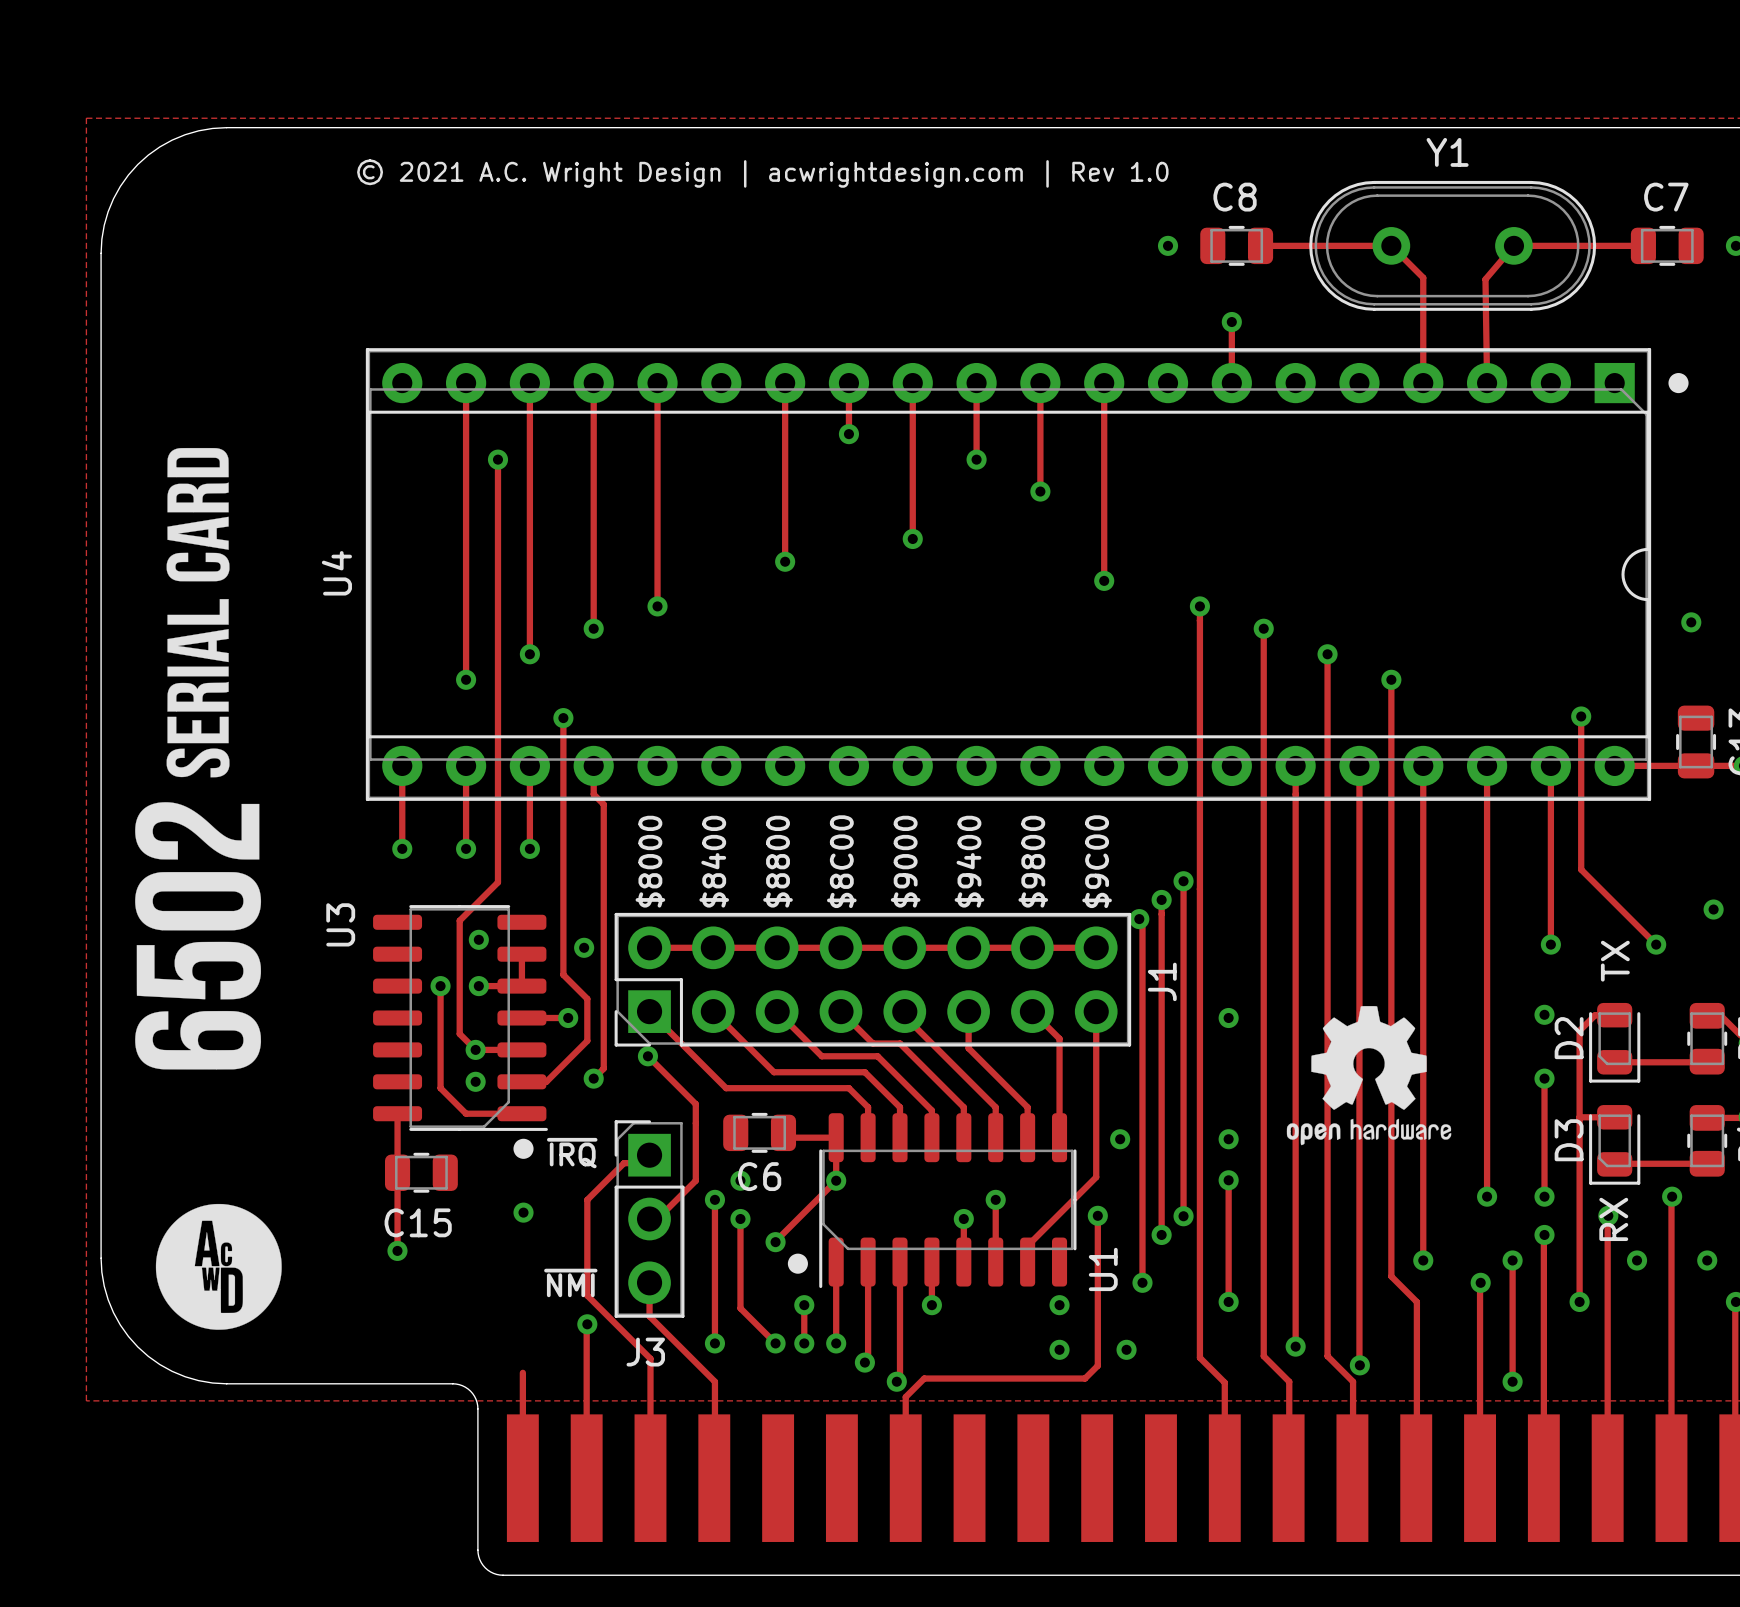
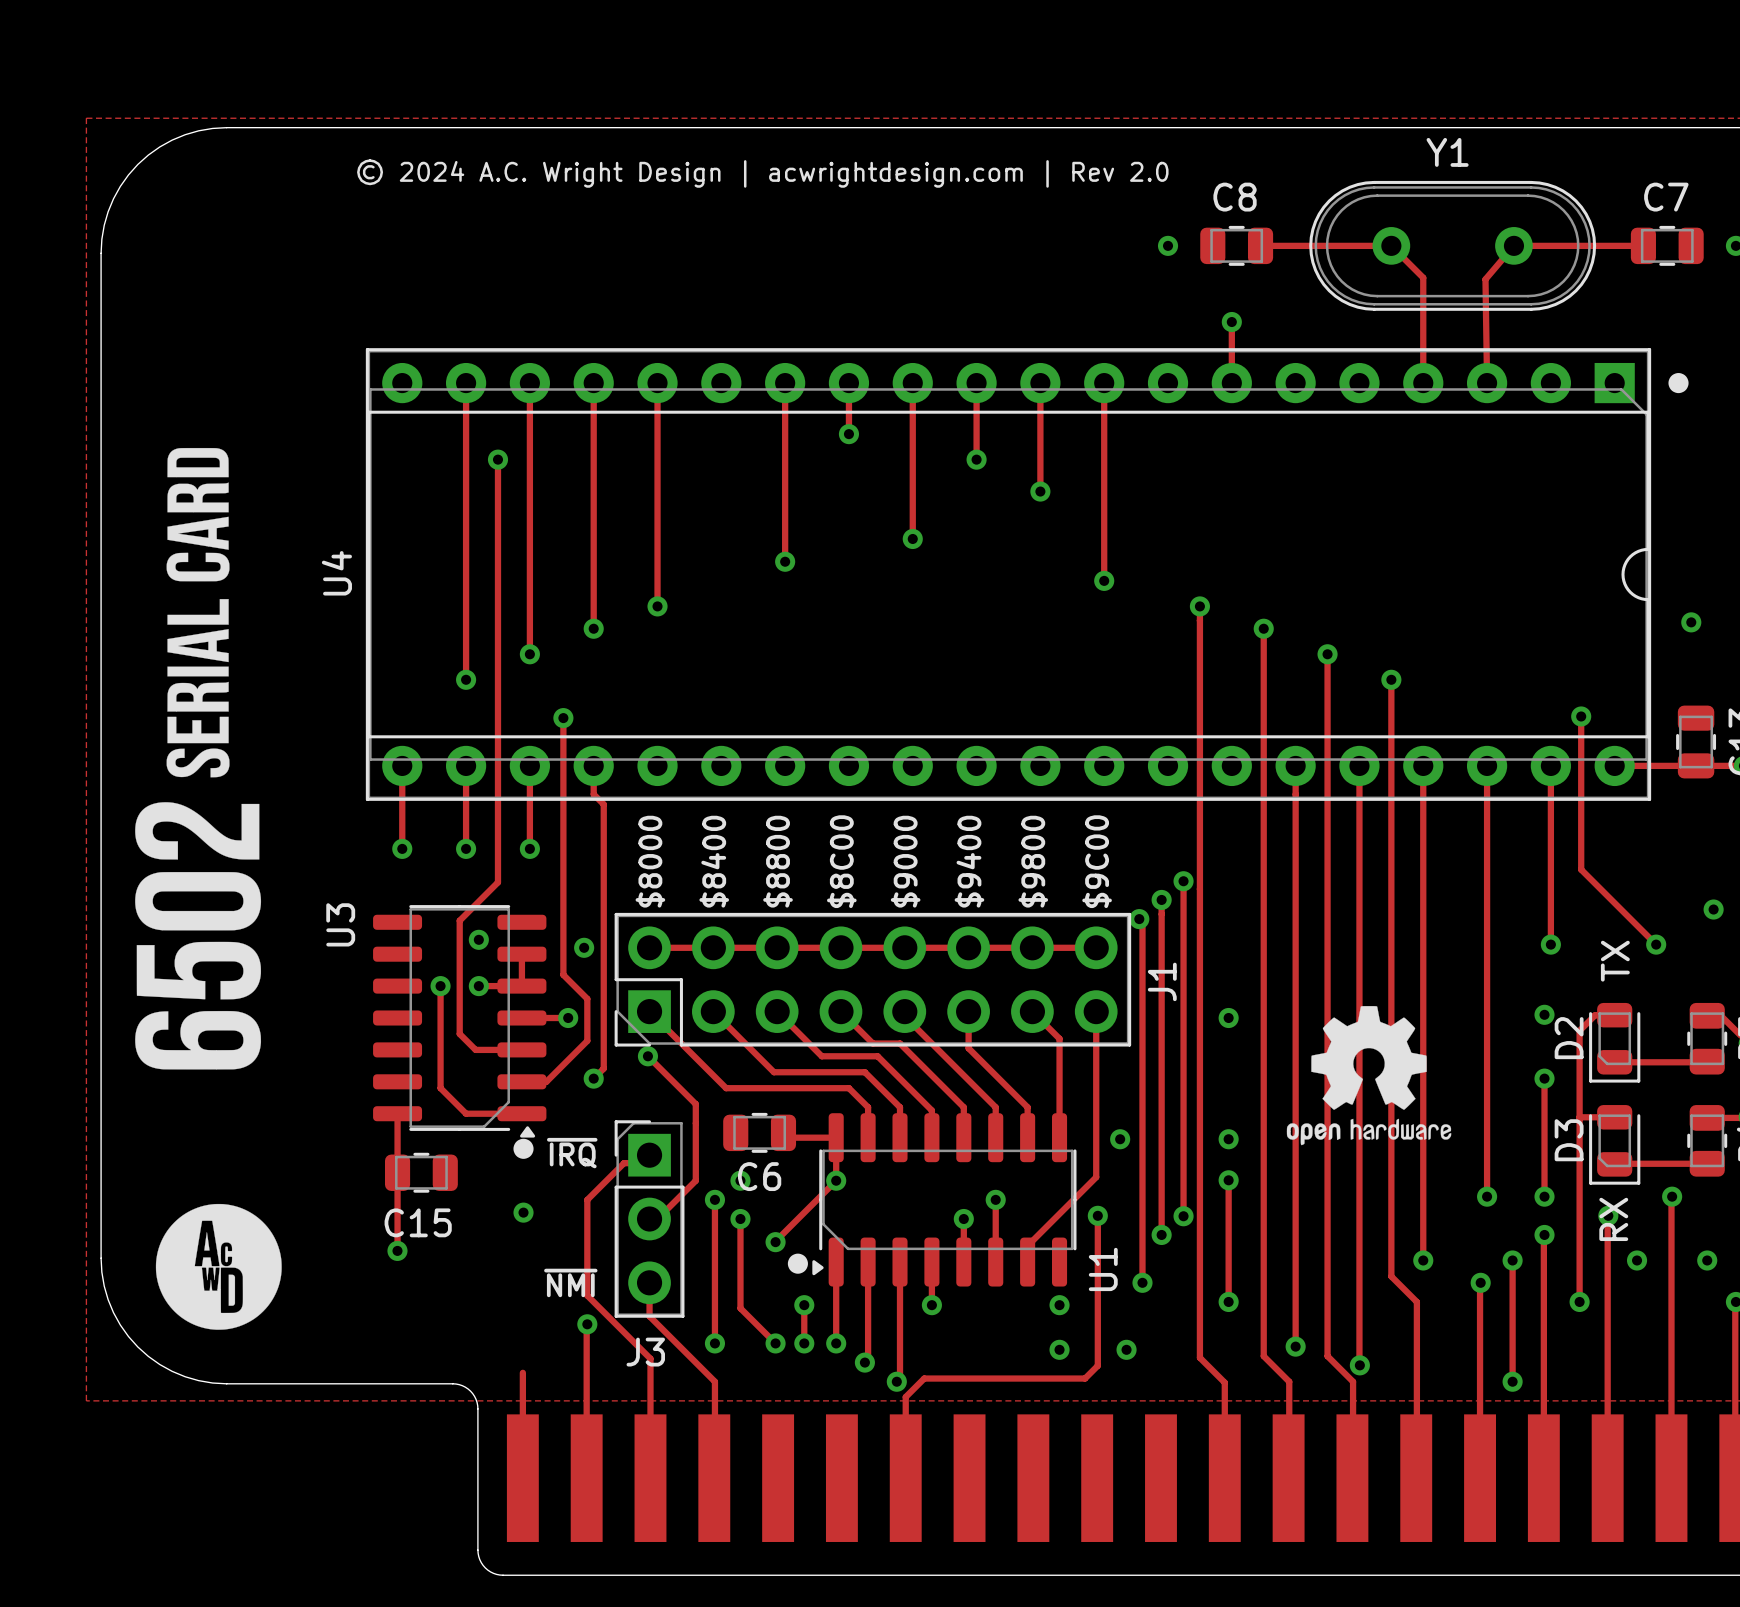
text: © 2021 A.C. Wright Design | acwrightdesign.com | Rev 1.0 (762, 173) -> © 2024 A.C. Wright Design | acwrightdesign.com | Rev 2.0 (762, 173)
U3 footprint: [373, 905, 548, 1131] -> [373, 905, 547, 1138]
via: (475, 1049) -> none
via: (475, 1081) -> none
U1 footprint: [819, 1113, 1077, 1289] -> [812, 1113, 1077, 1287]

